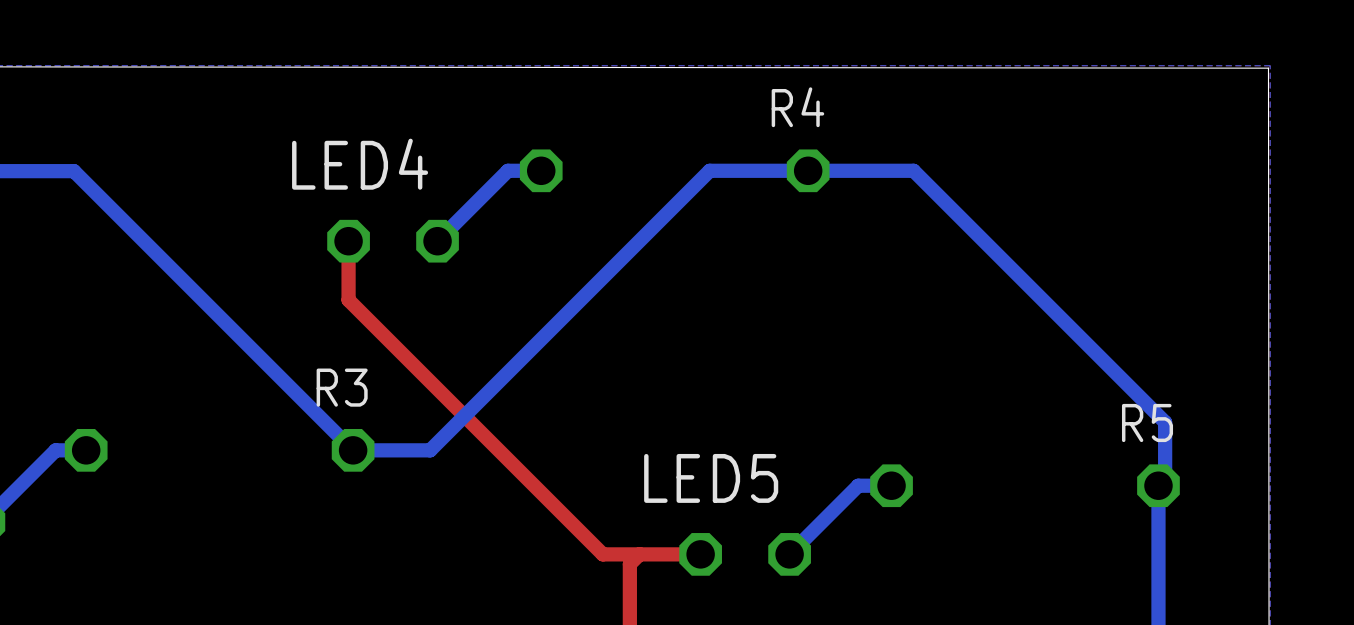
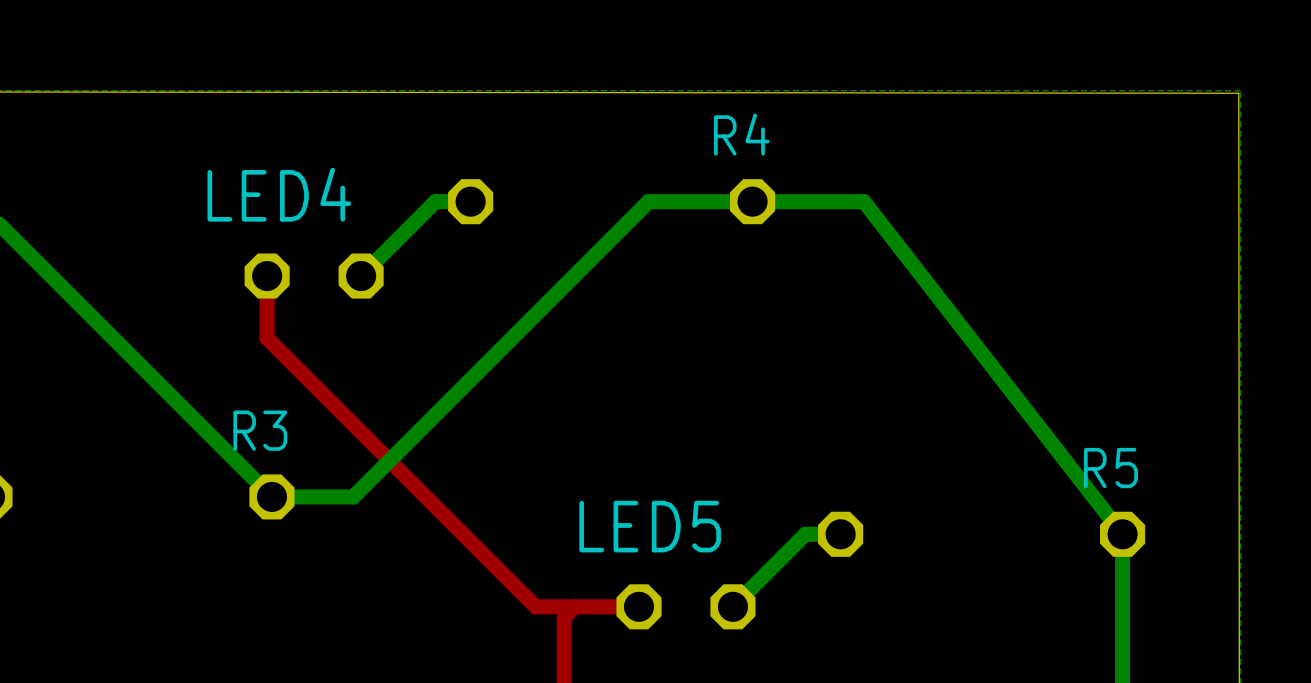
bottom track: (913, 170) (1165, 422) (1165, 479) (1158, 485) -> (863, 201) (1122, 534)

